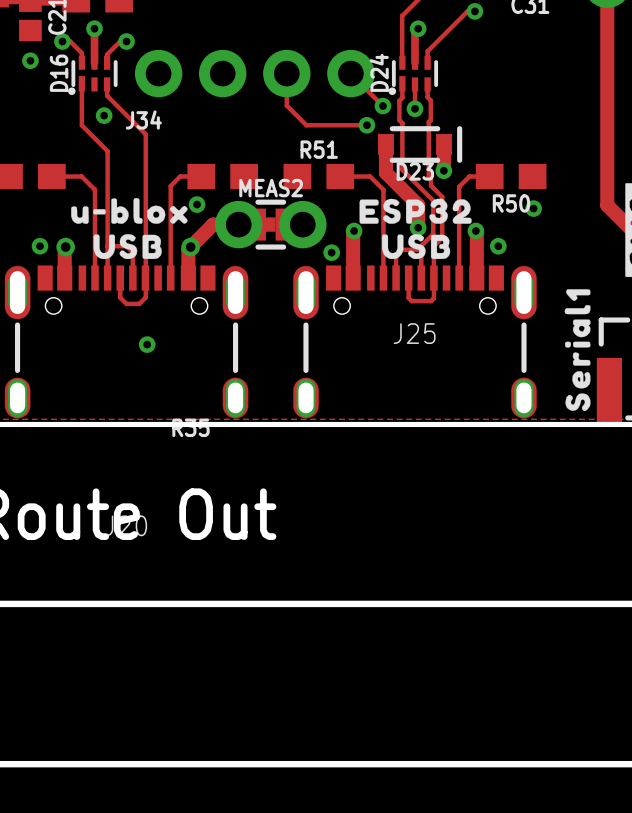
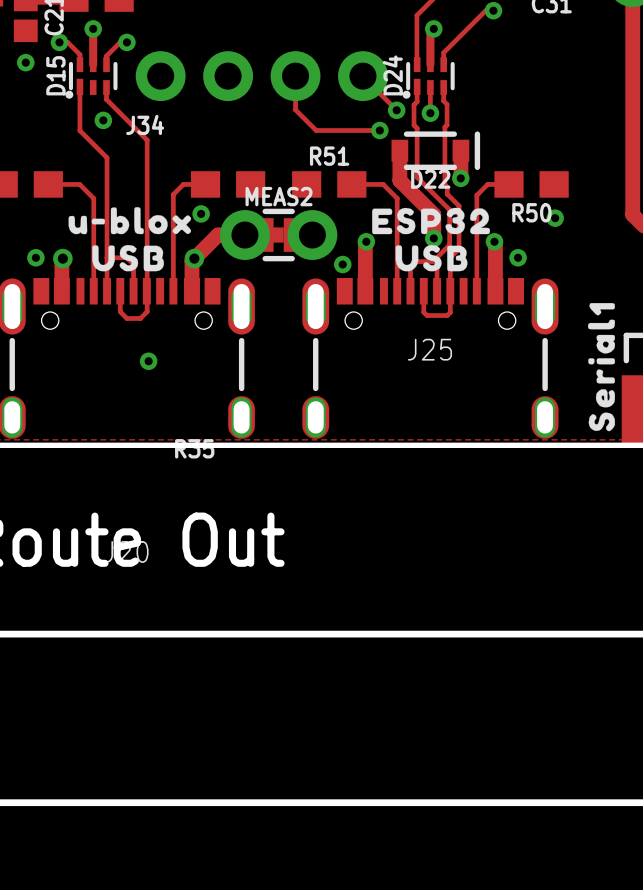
D16 name: D16 (59, 73) -> D15 (55, 75)
D23 name: D23 (415, 171) -> D22 (430, 179)

